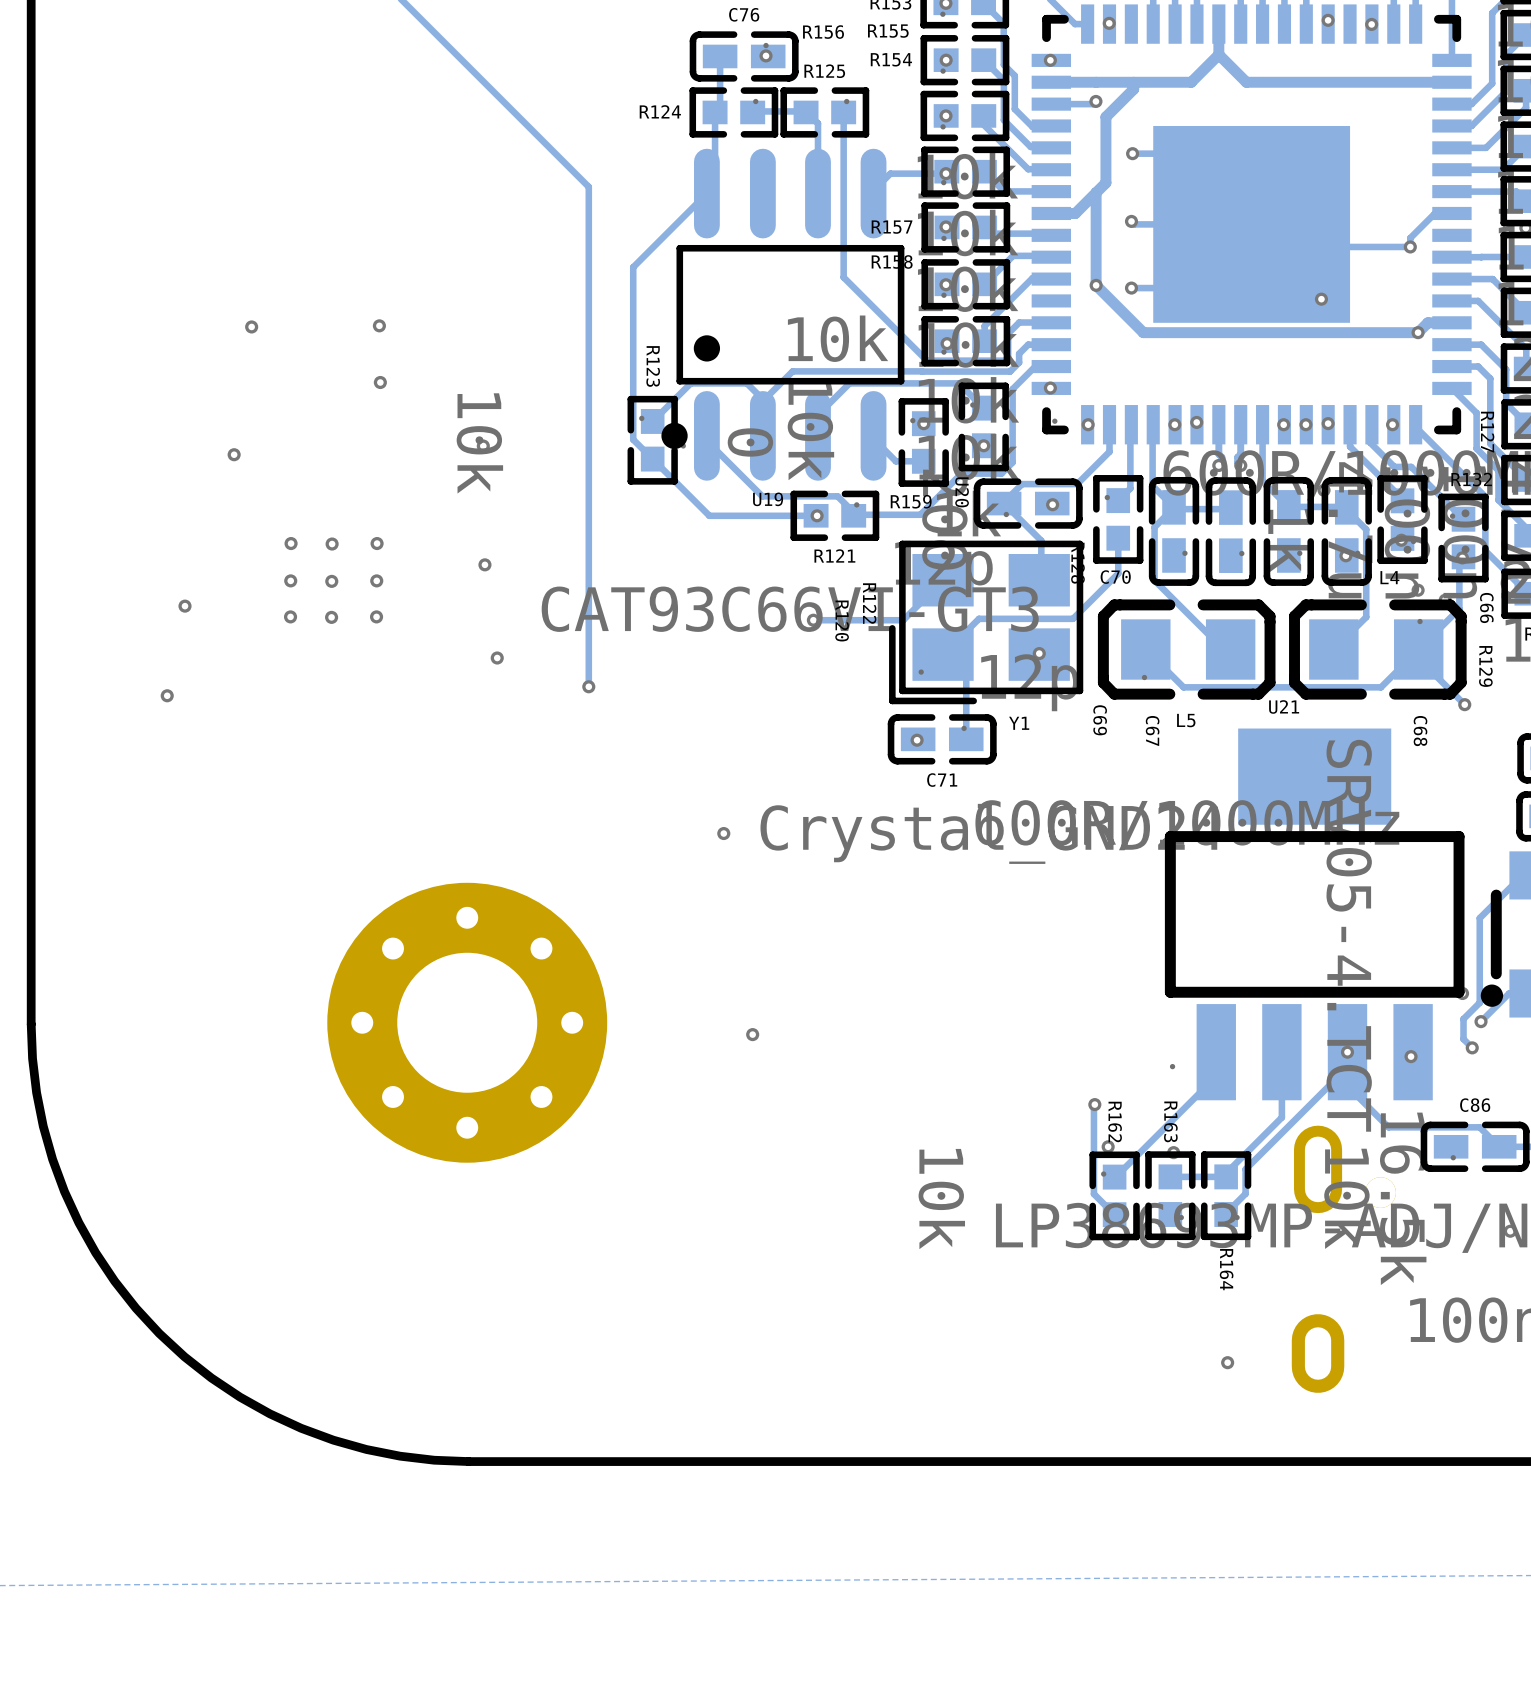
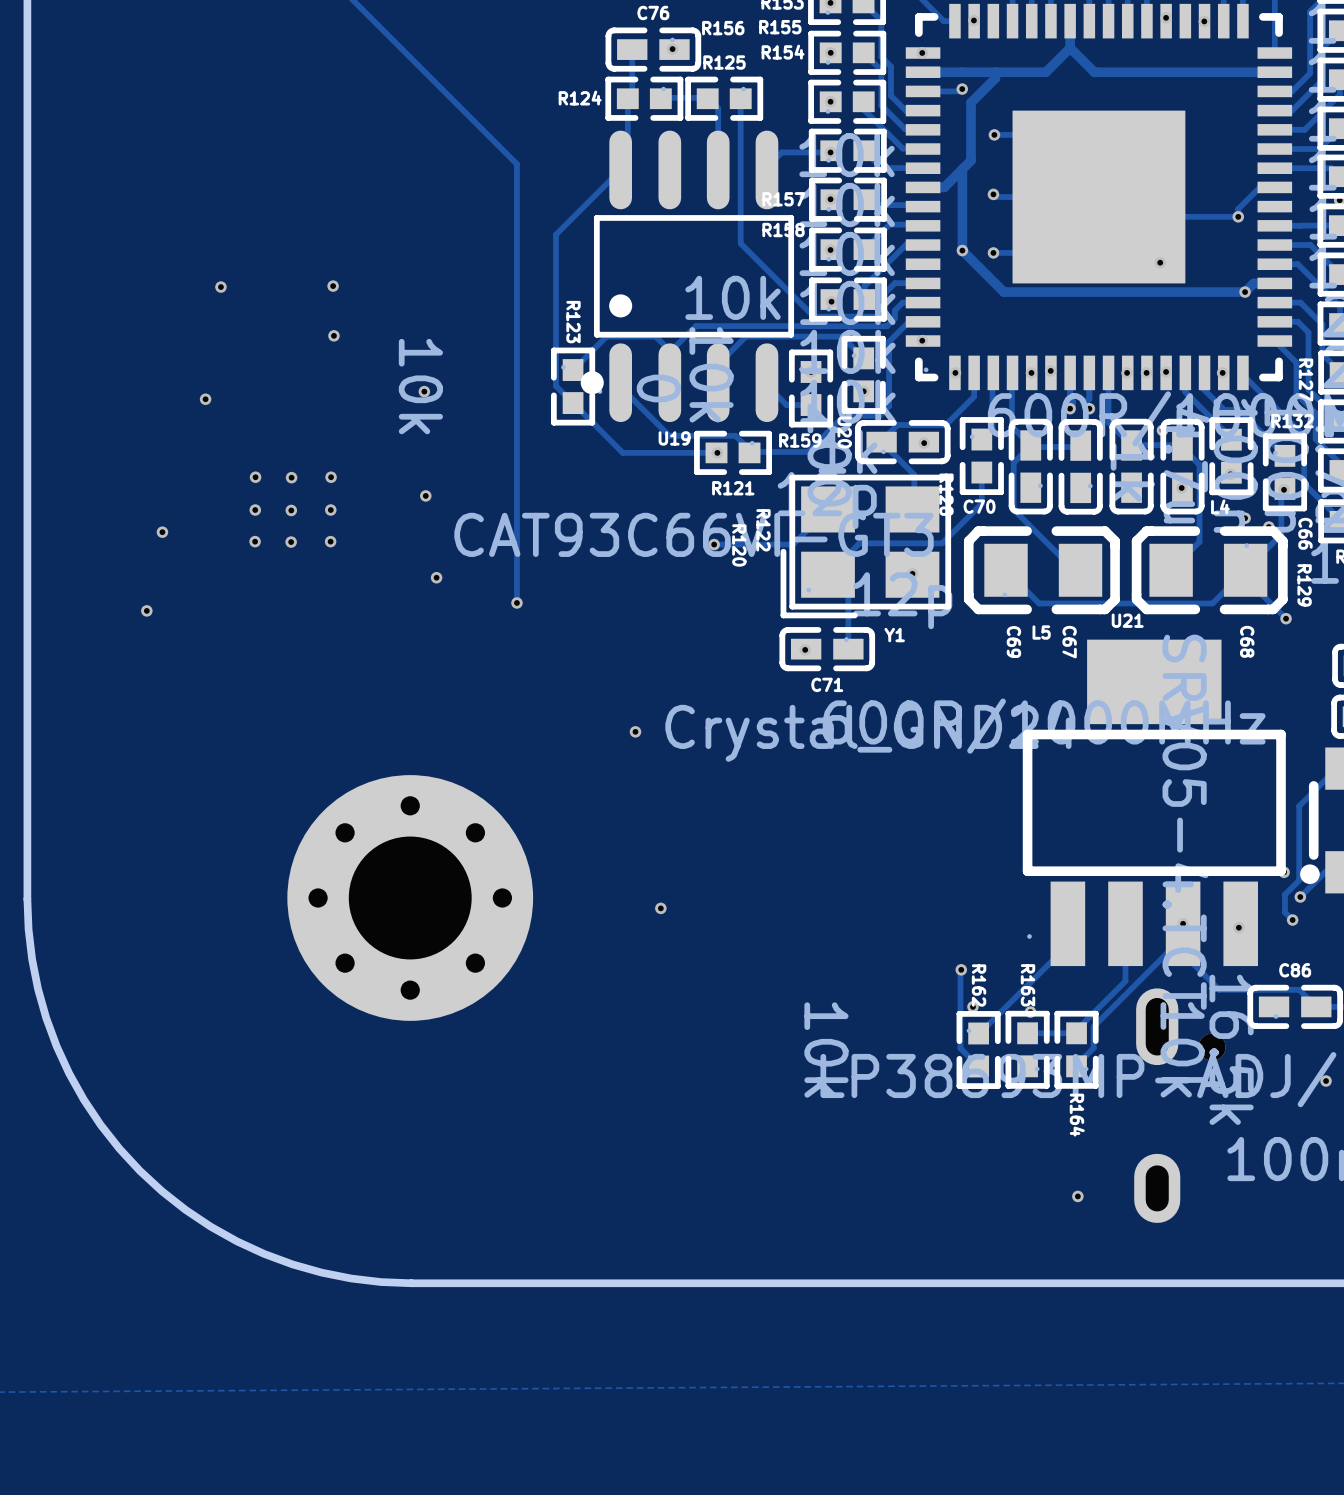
C69 name position: C69 (1100, 720) -> C69 (1013, 642)
C67 name position: C67 (1152, 730) -> C67 (1069, 642)

